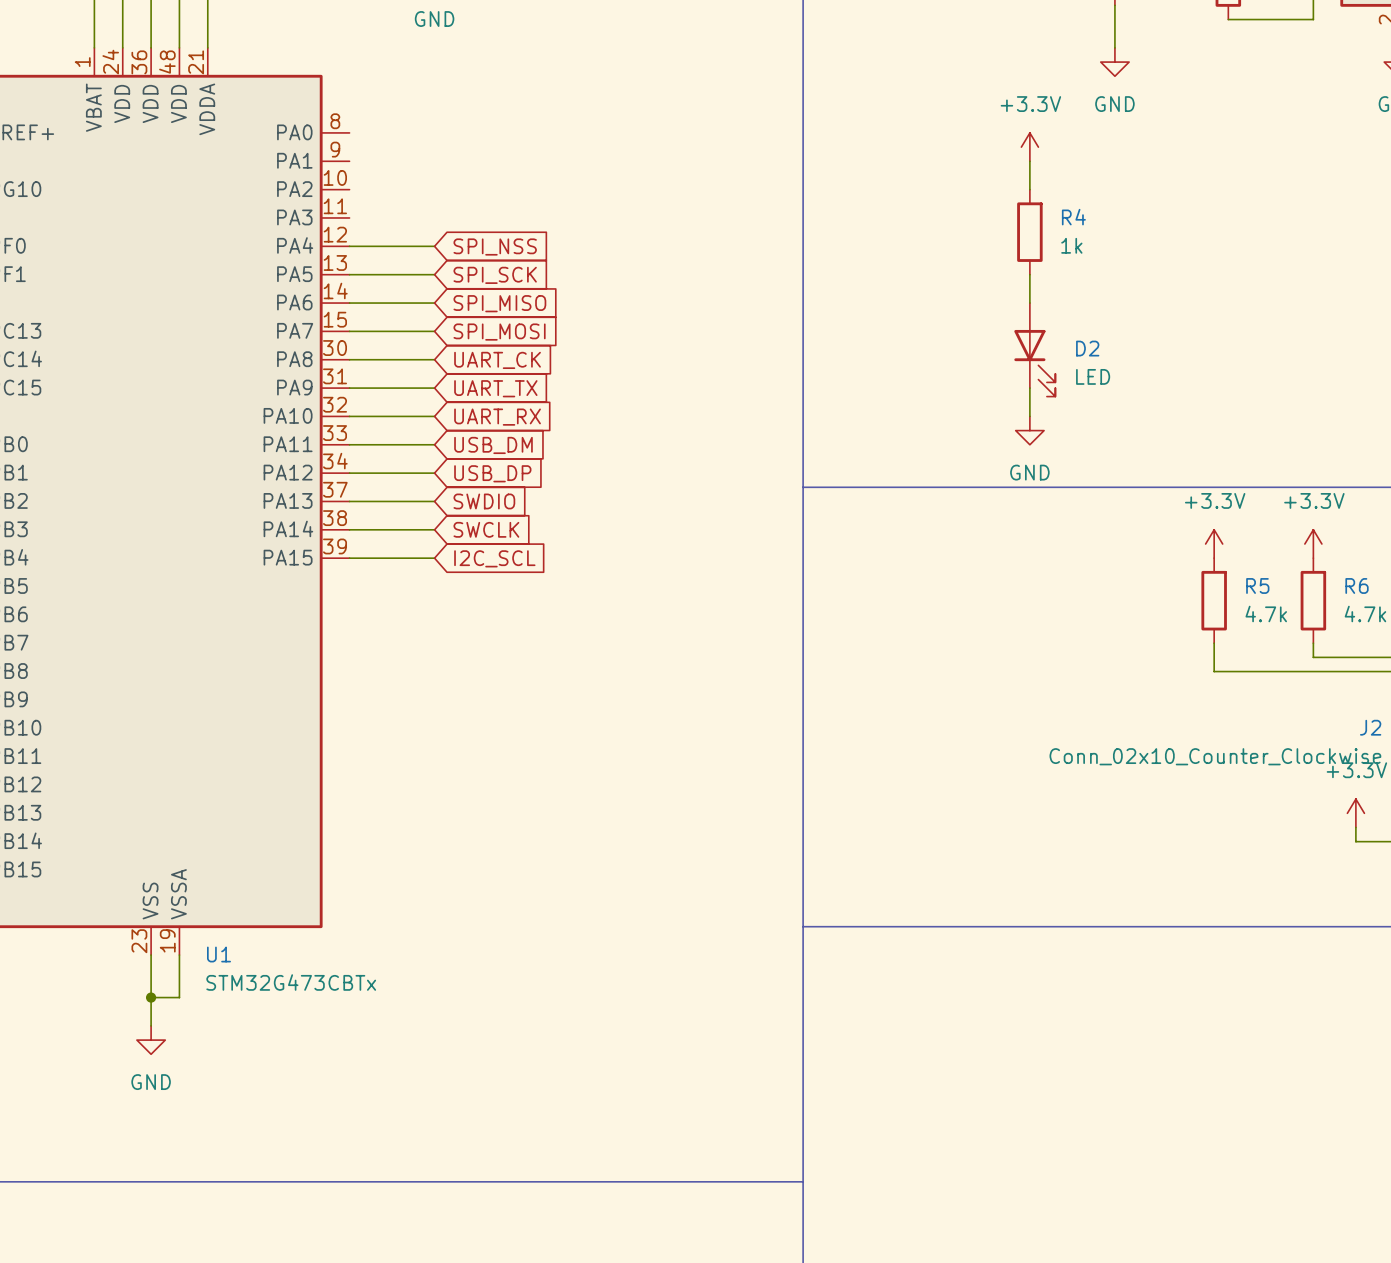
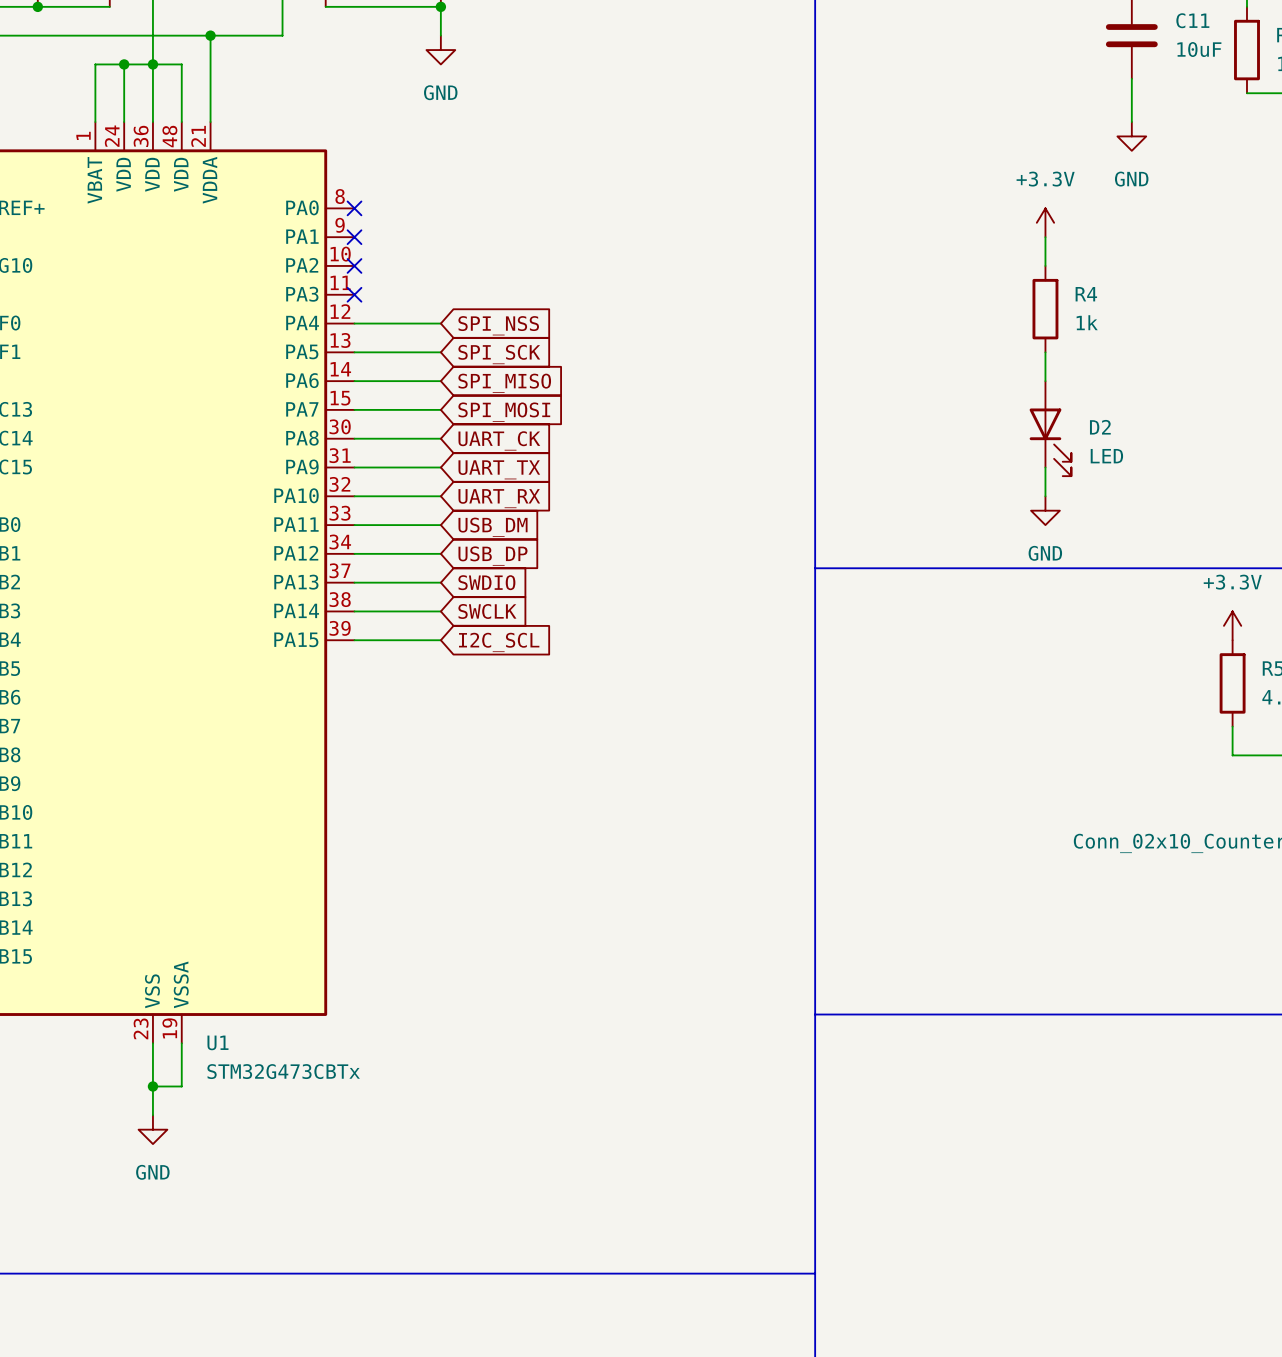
no-connect mark: none -> (354, 208)
no-connect mark: none -> (354, 237)
no-connect mark: none -> (354, 265)
no-connect mark: none -> (354, 294)

